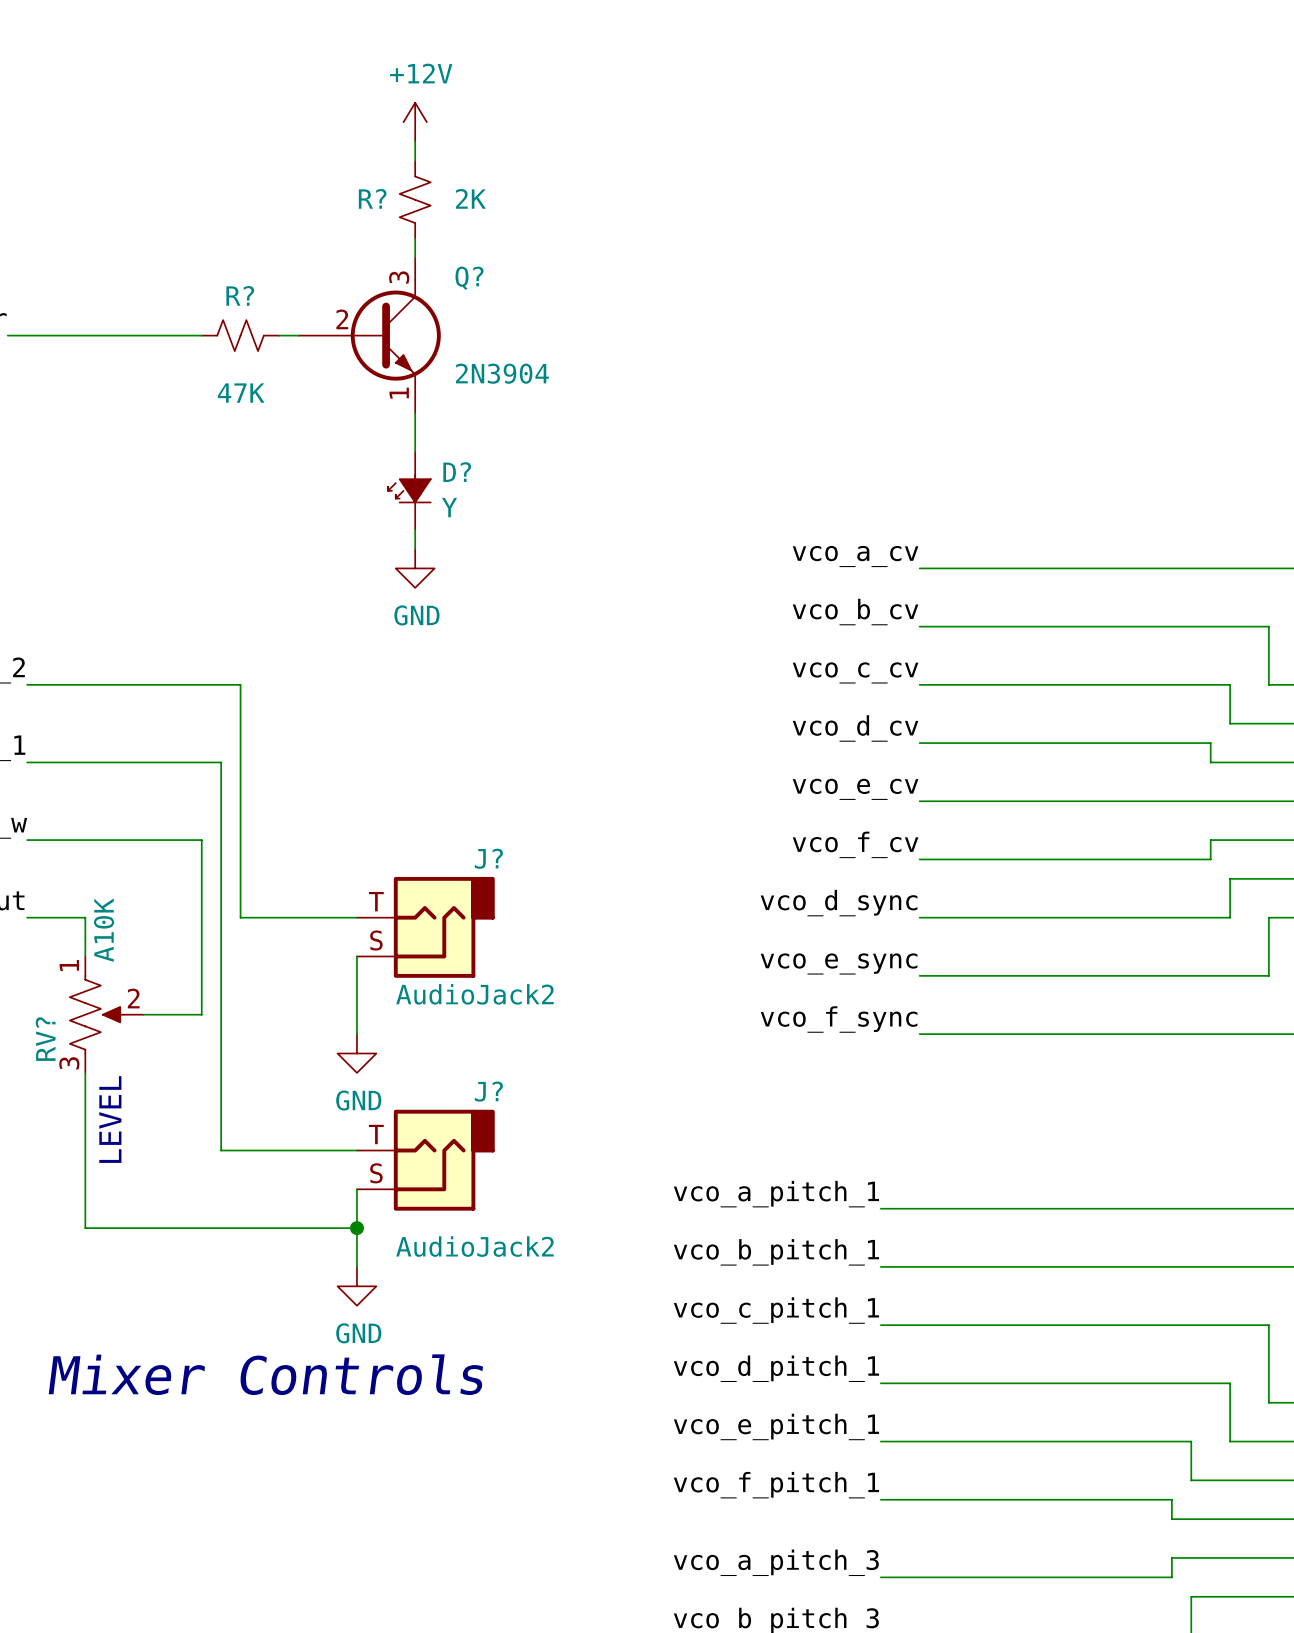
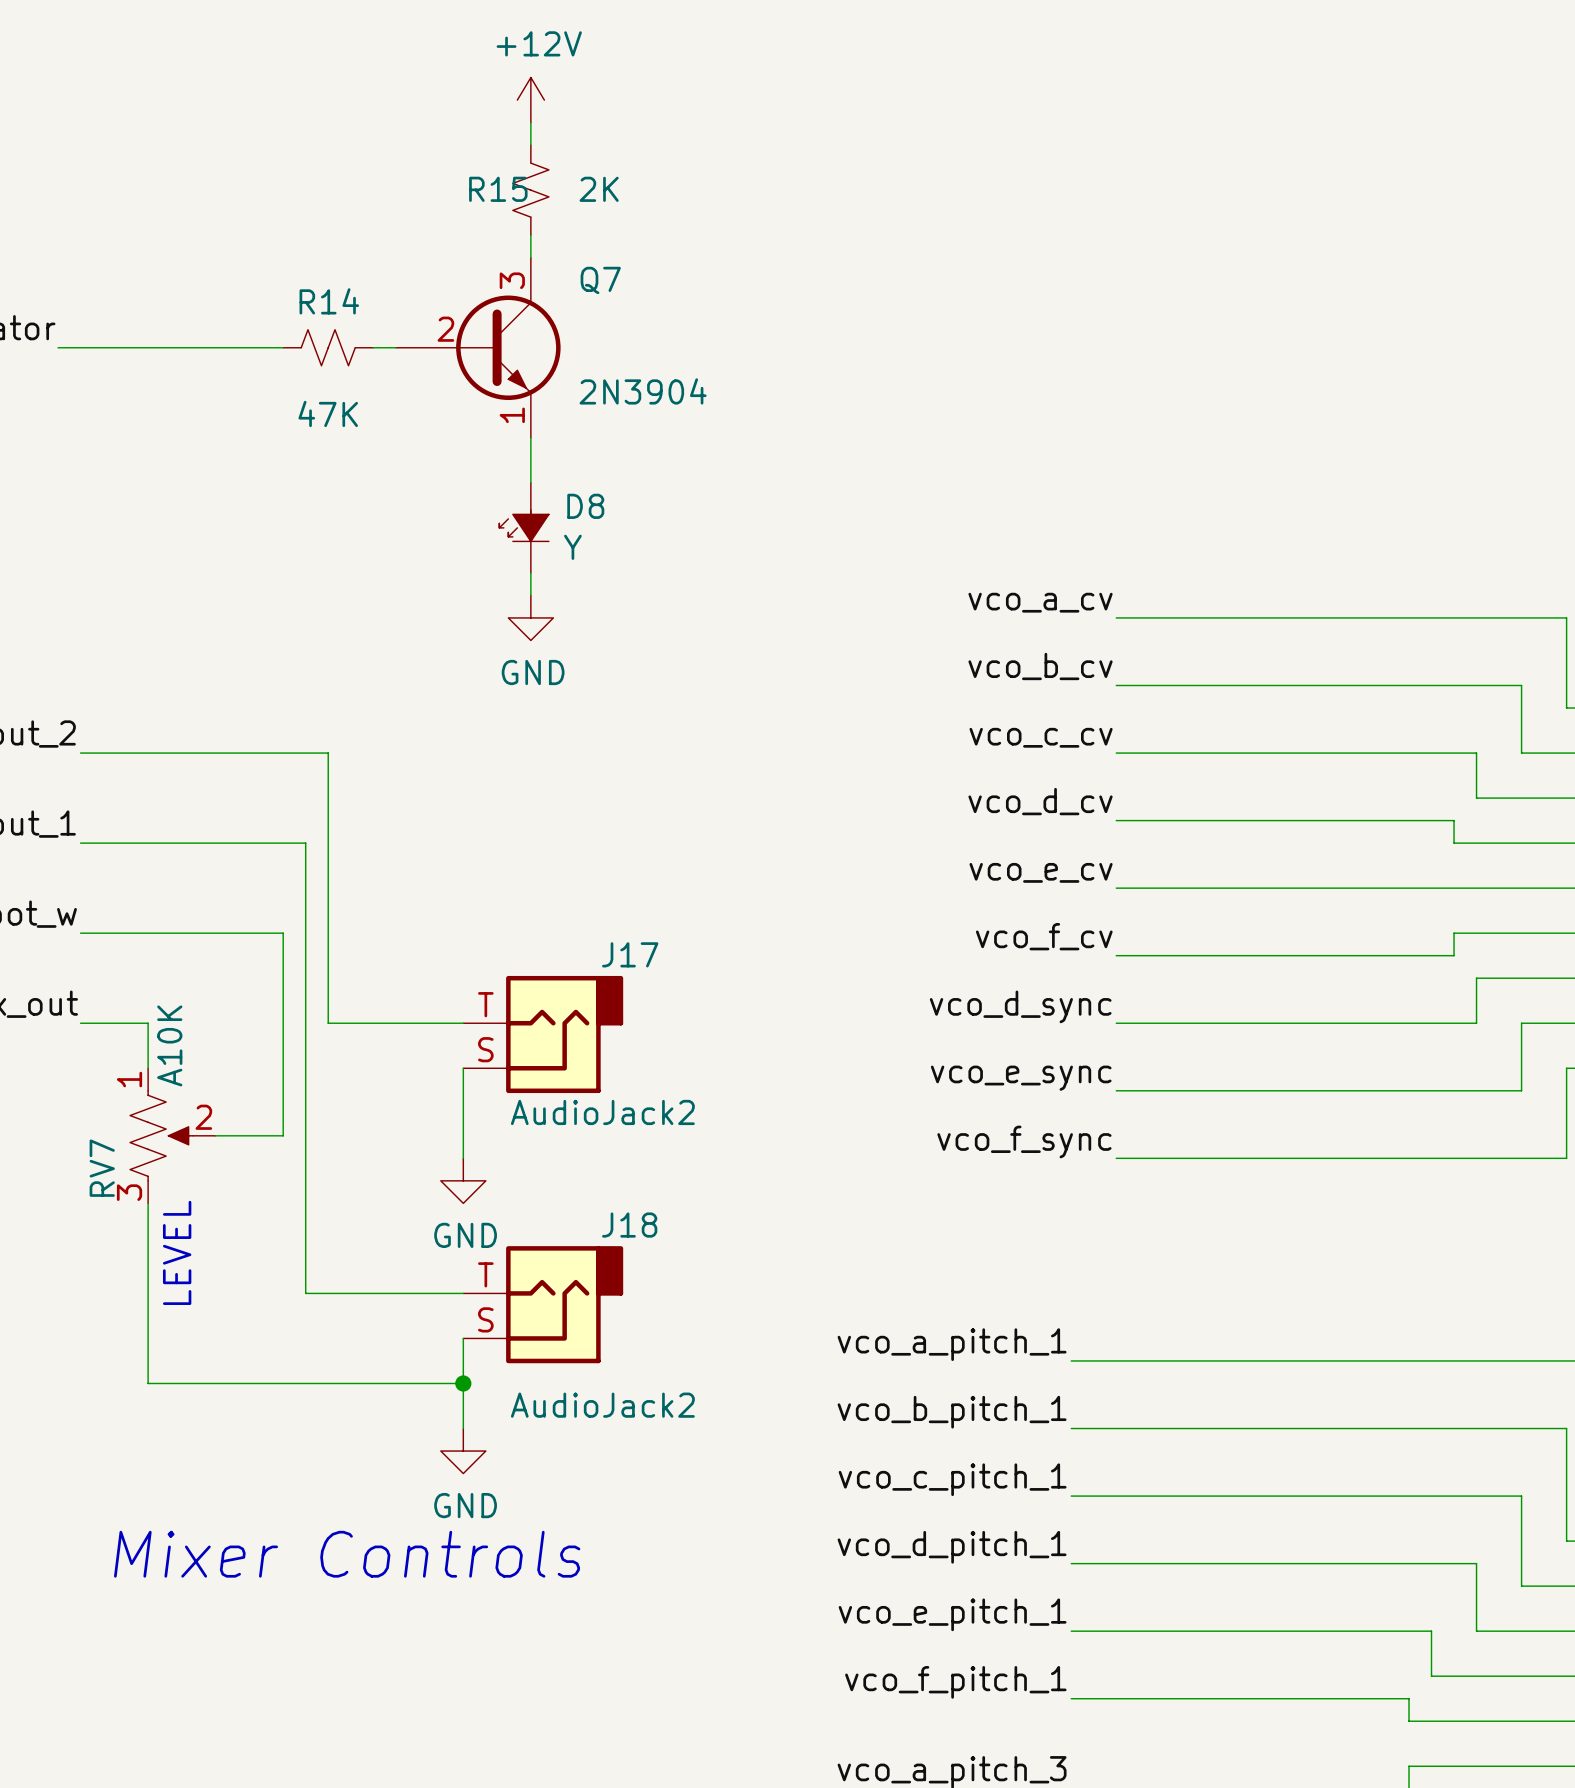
R? name: R? (372, 198) -> R15 (498, 189)
Q? name: Q? (469, 278) -> Q7 (600, 280)
R? name: R? (240, 295) -> R14 (329, 301)
D? name: D? (457, 472) -> D8 (585, 506)
J? name: J? (488, 858) -> J17 (630, 954)
RV? name: RV? (45, 1039) -> RV7 (102, 1168)
J? name: J? (488, 1091) -> J18 (629, 1225)

